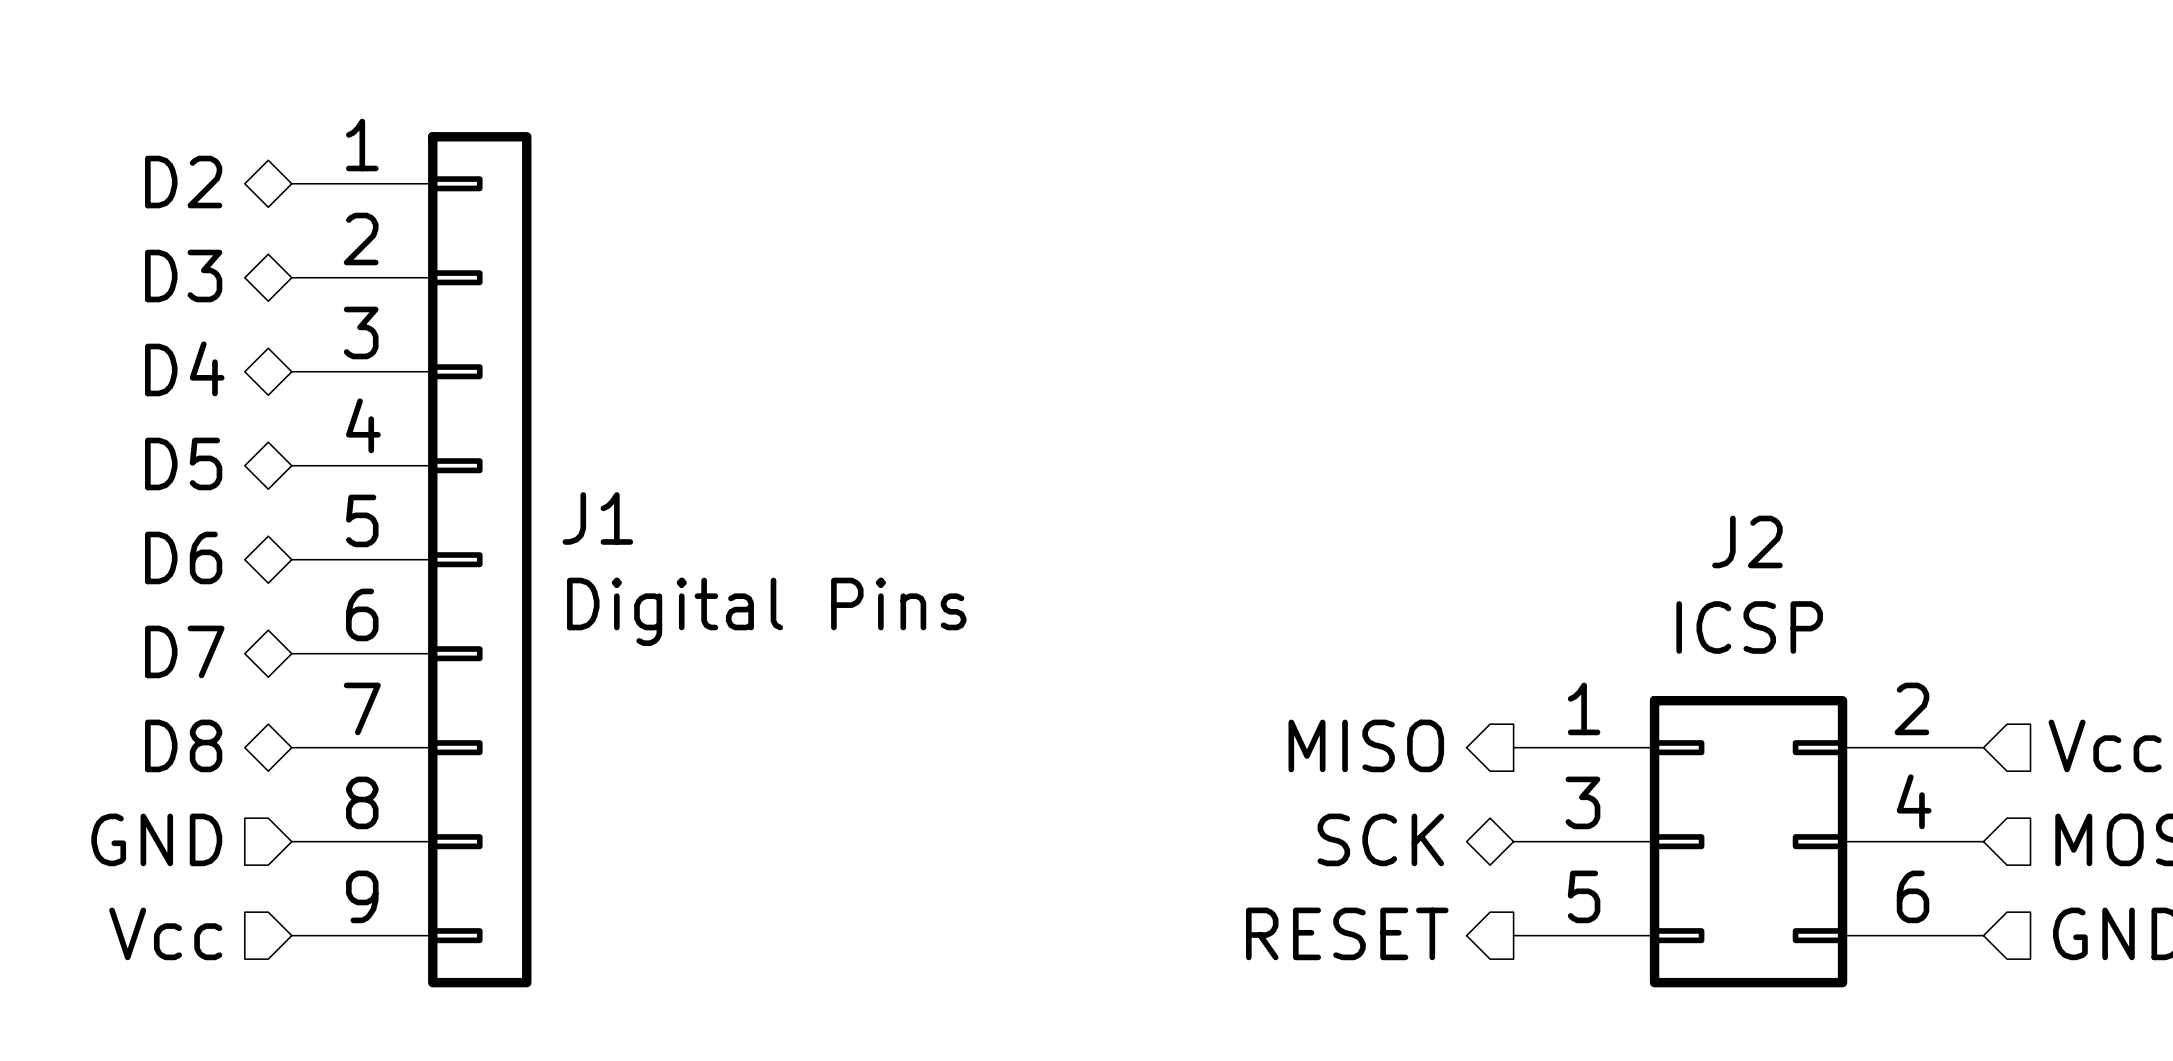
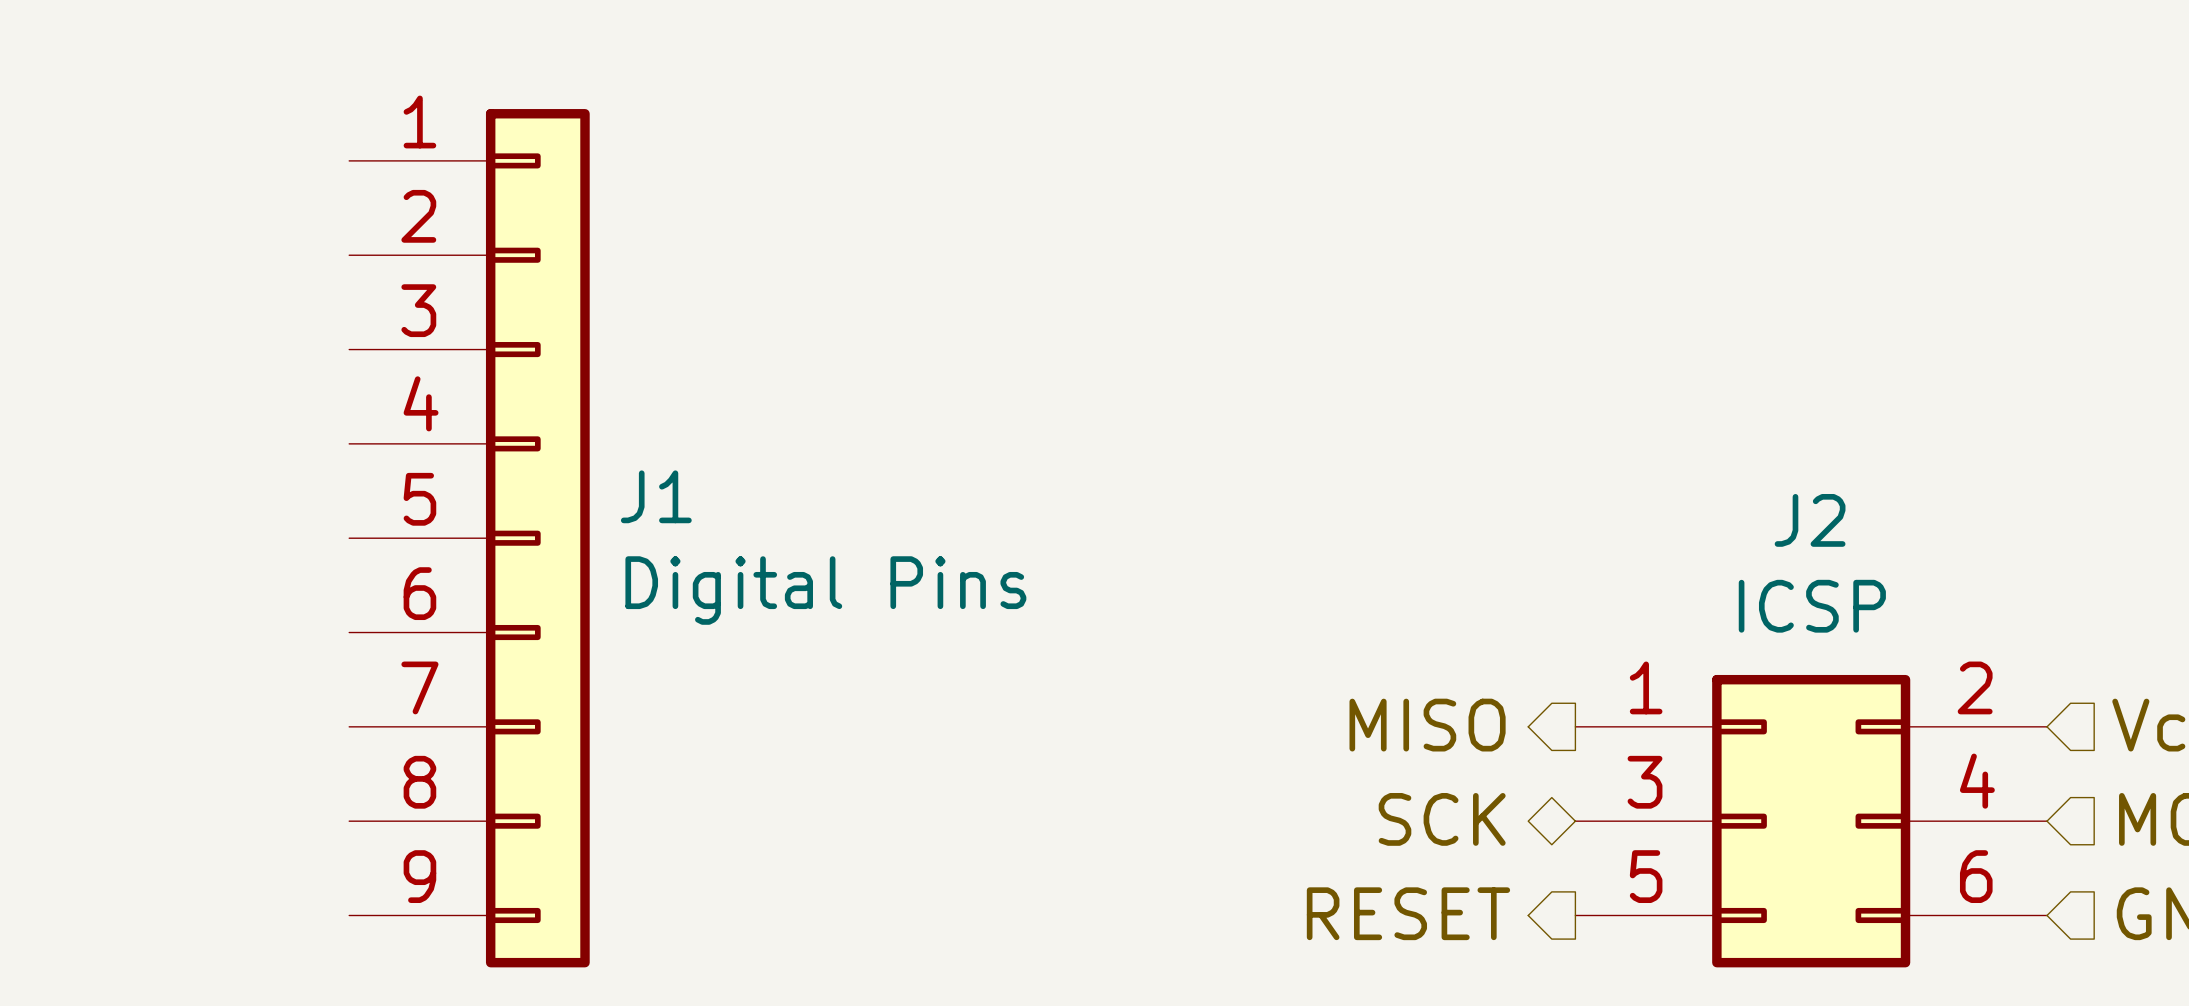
hierarchical label: D2 (183, 182) -> none
hierarchical label: D3 (183, 276) -> none
hierarchical label: D4 (184, 368) -> none
hierarchical label: D5 (183, 463) -> none
hierarchical label: D6 (183, 557) -> none
hierarchical label: D7 (184, 651) -> none
hierarchical label: D8 (183, 745) -> none
hierarchical label: GND (156, 839) -> none
hierarchical label: Vcc (165, 933) -> none

